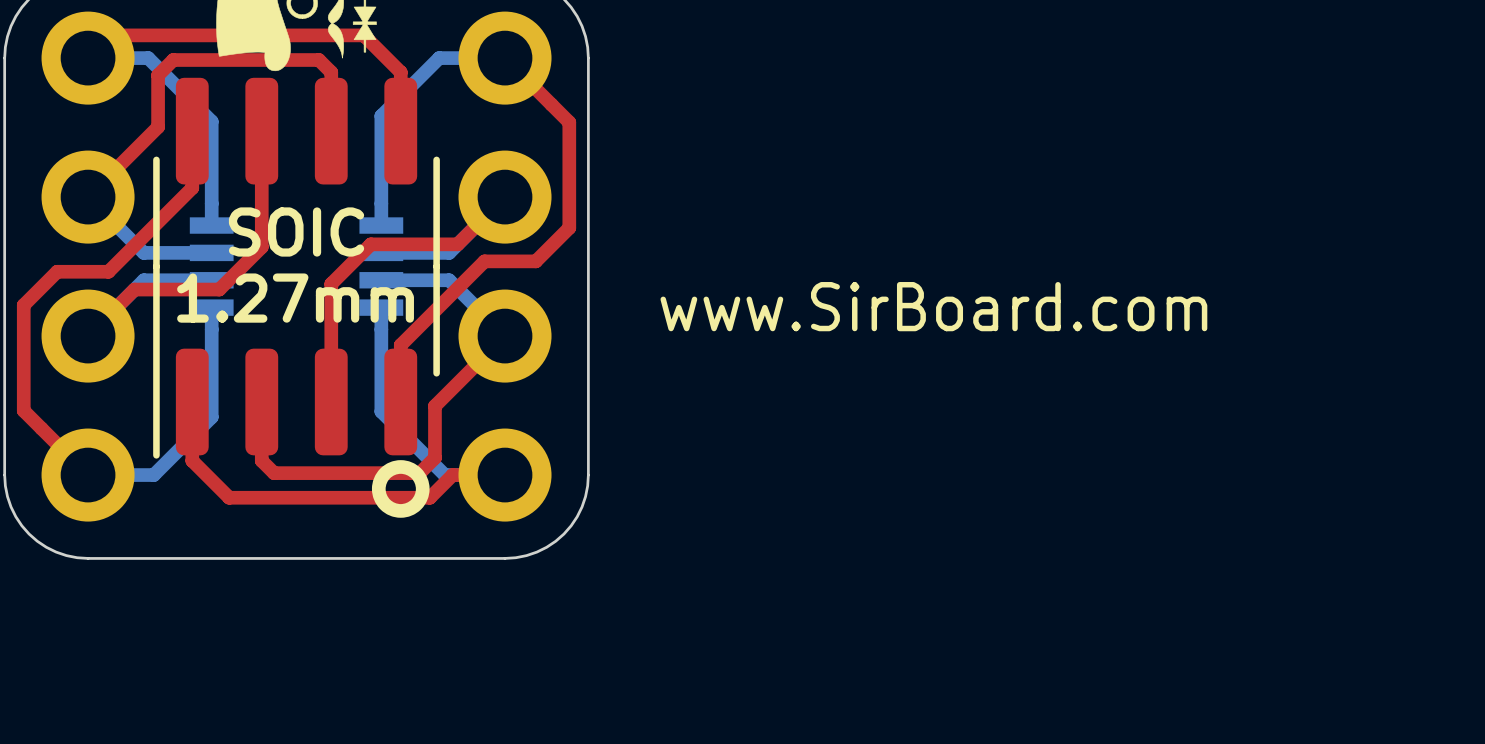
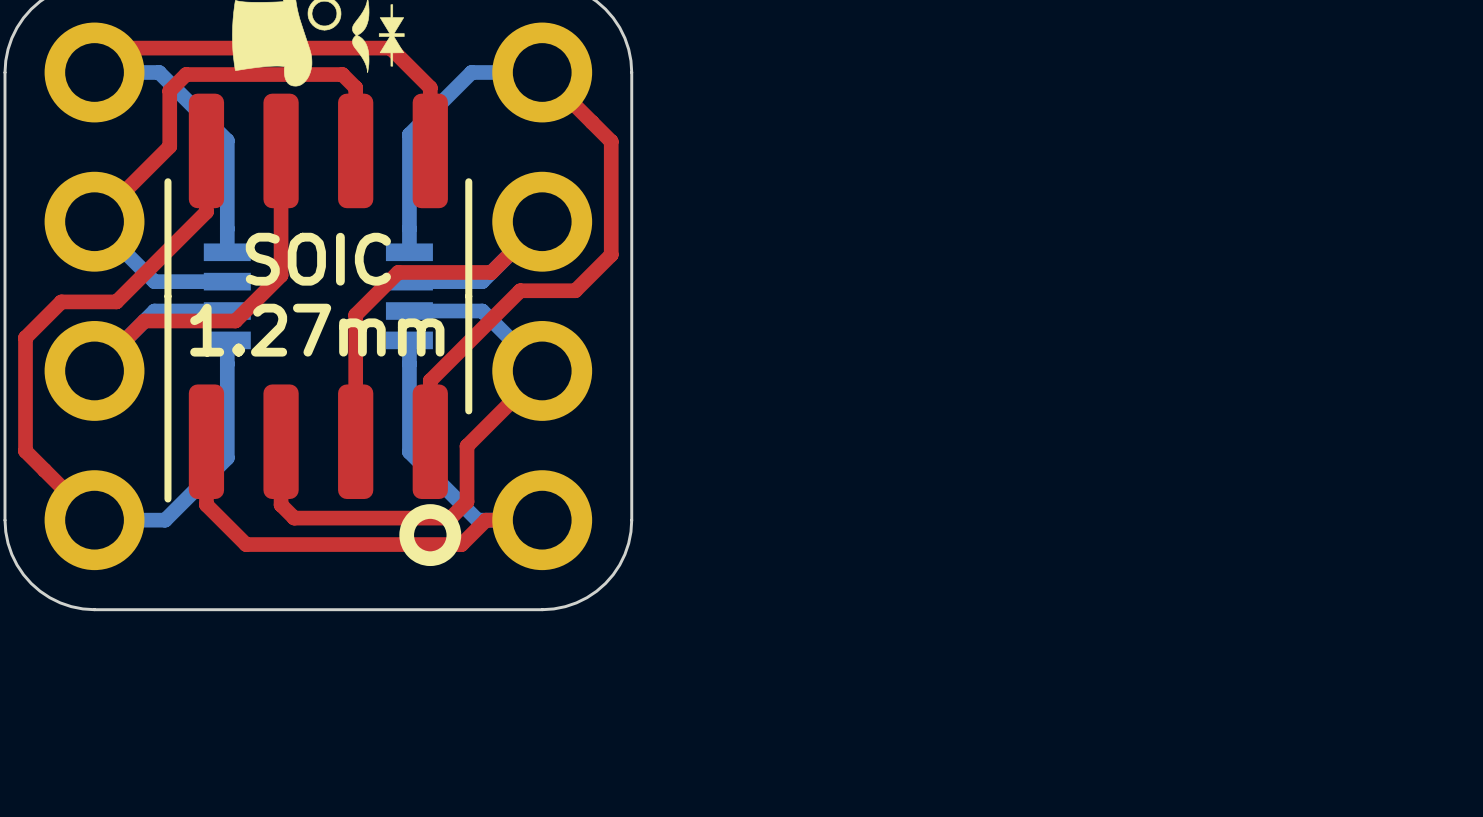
text: www.SirBoard.com (933, 306) -> none

